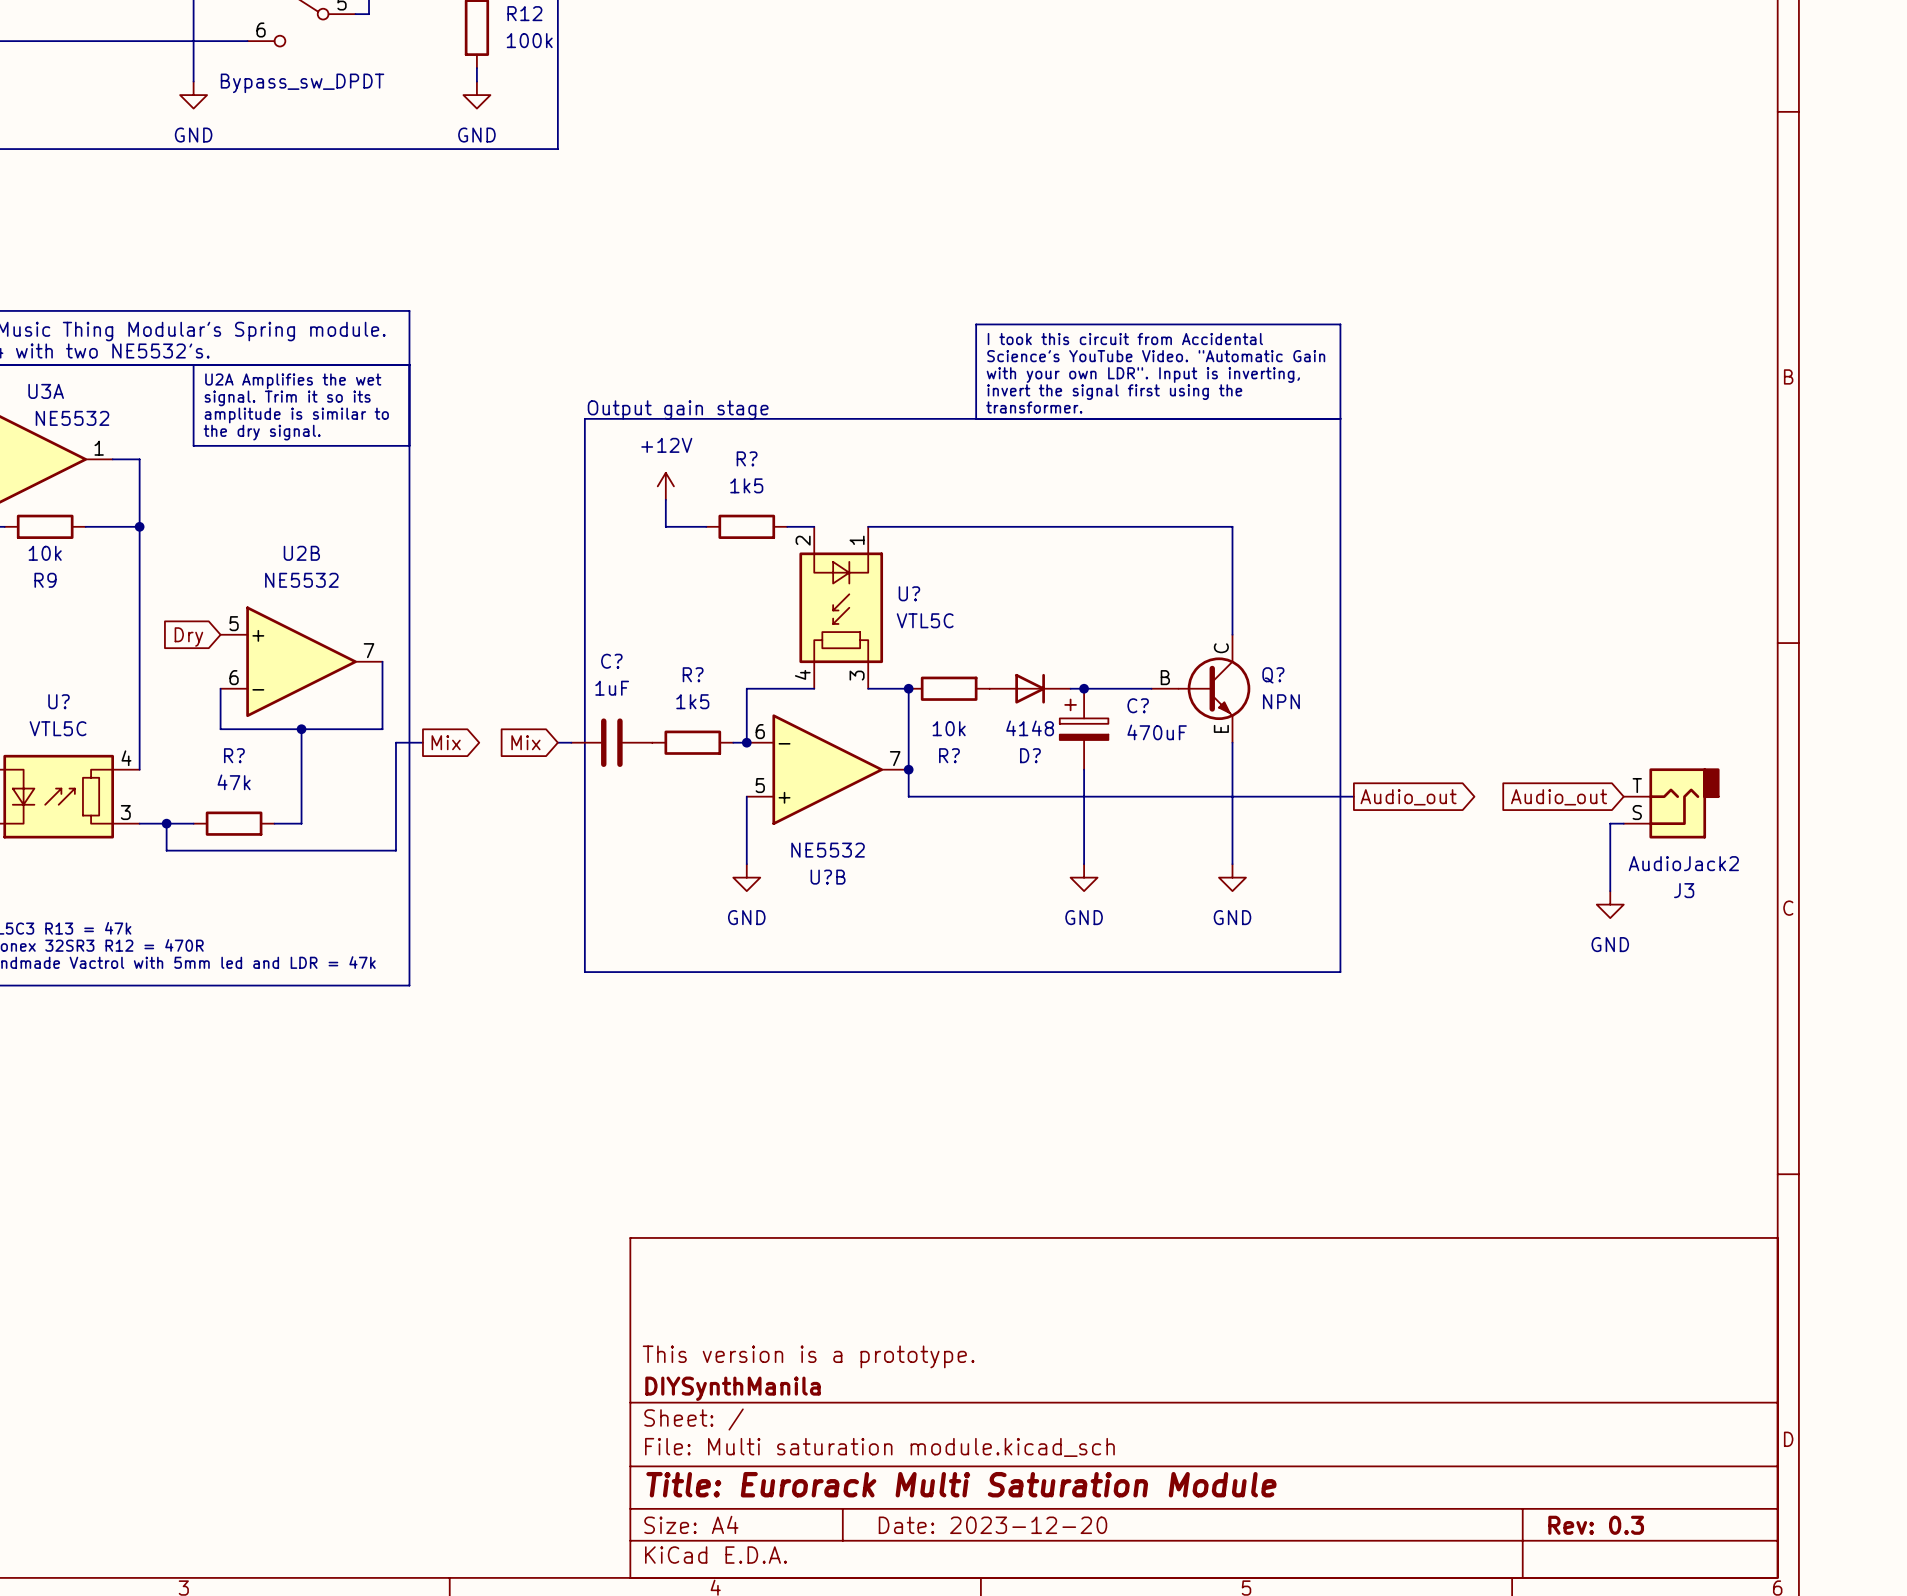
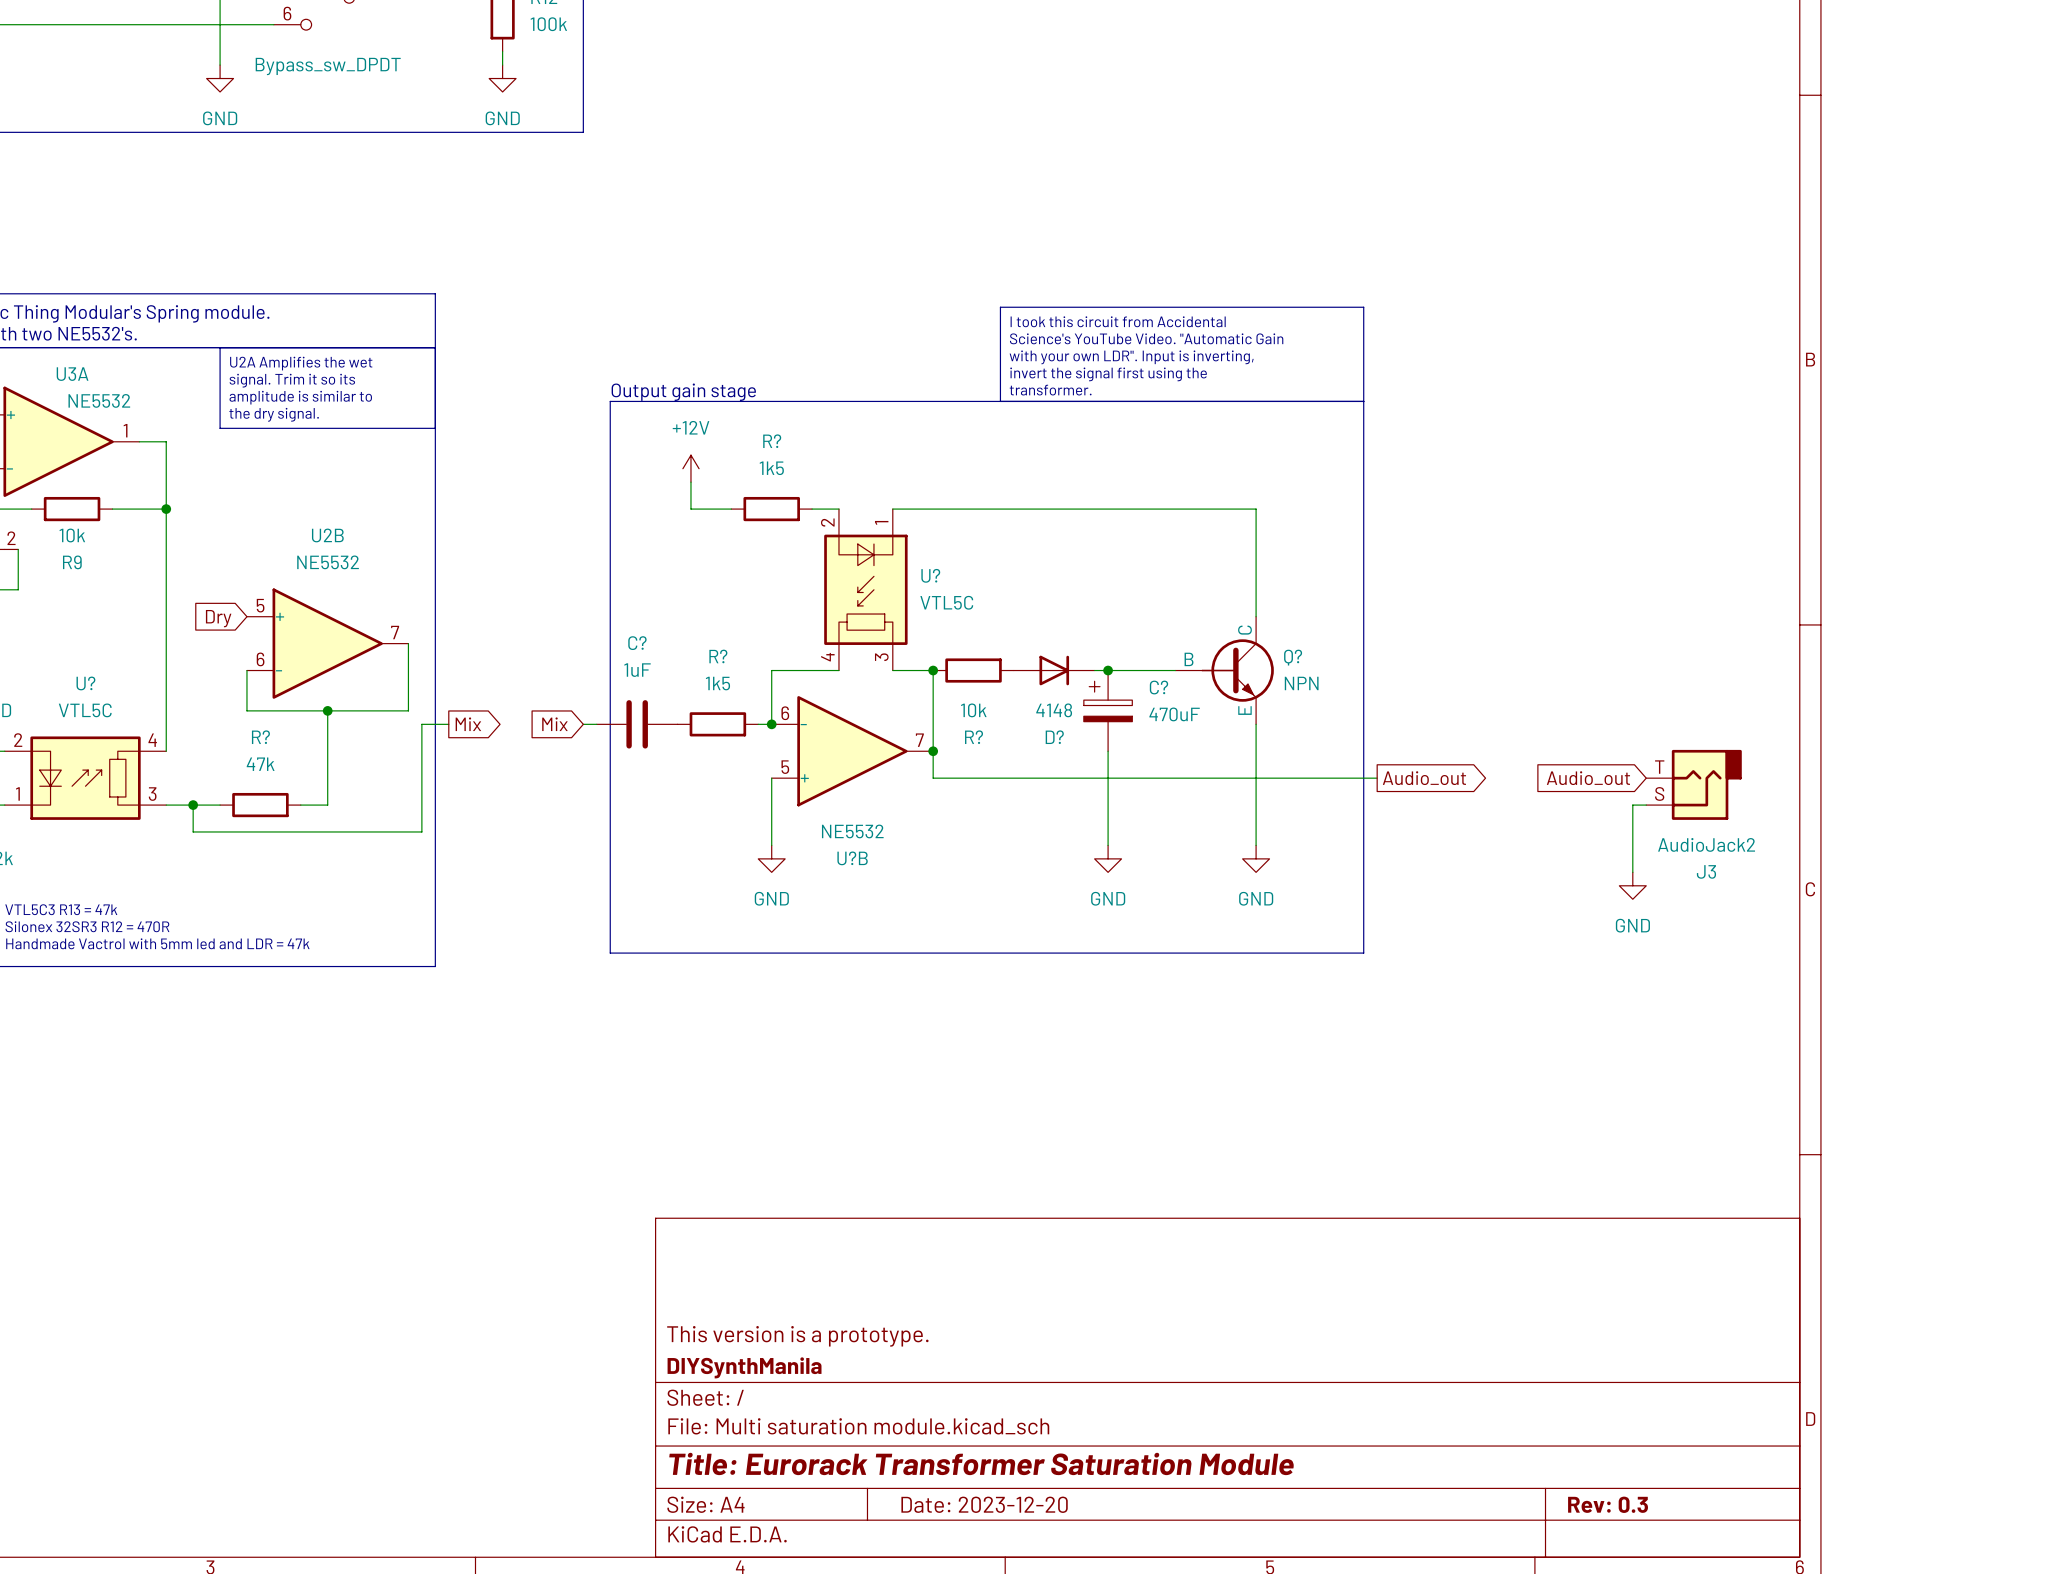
title block: Title: Eurorack Multi Saturation Module (961, 1484) -> Title: Eurorack Transformer Saturation Module (981, 1463)

